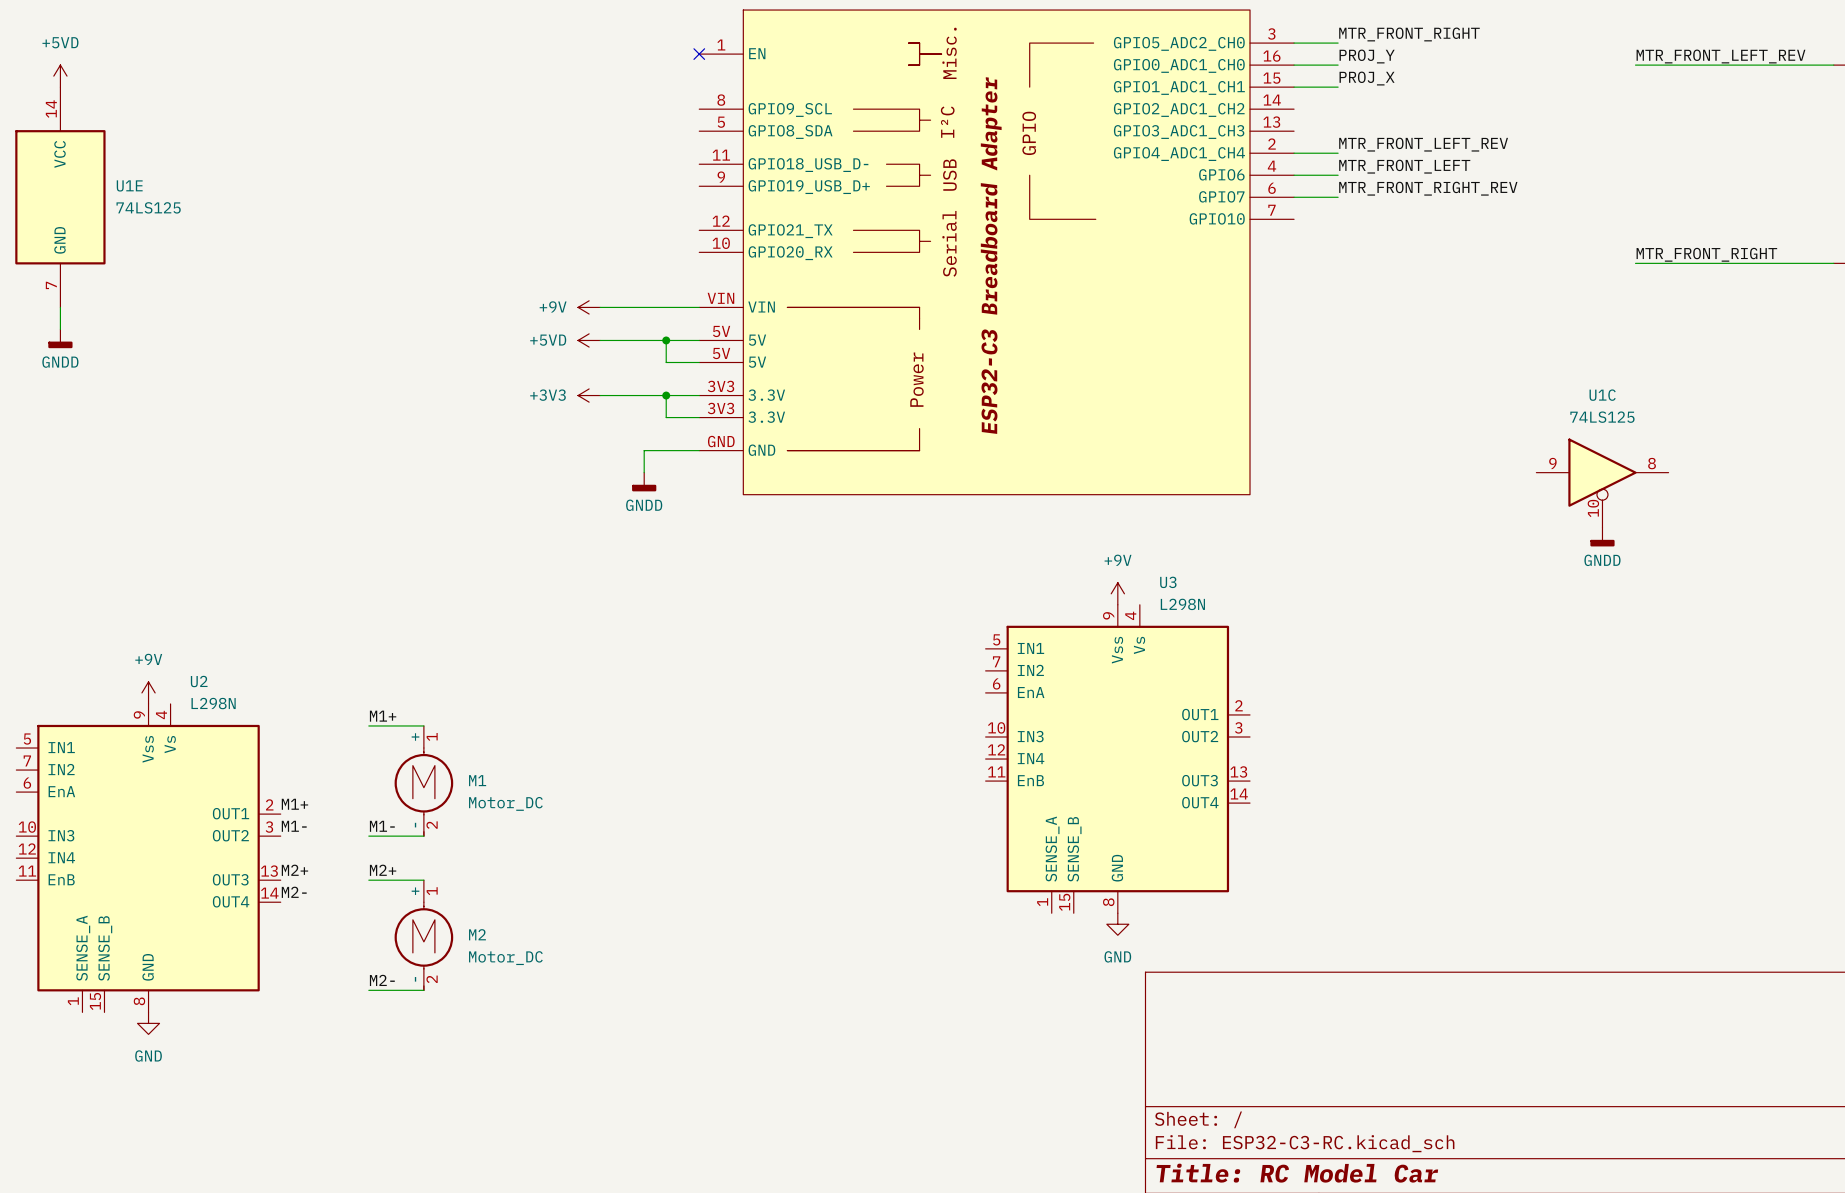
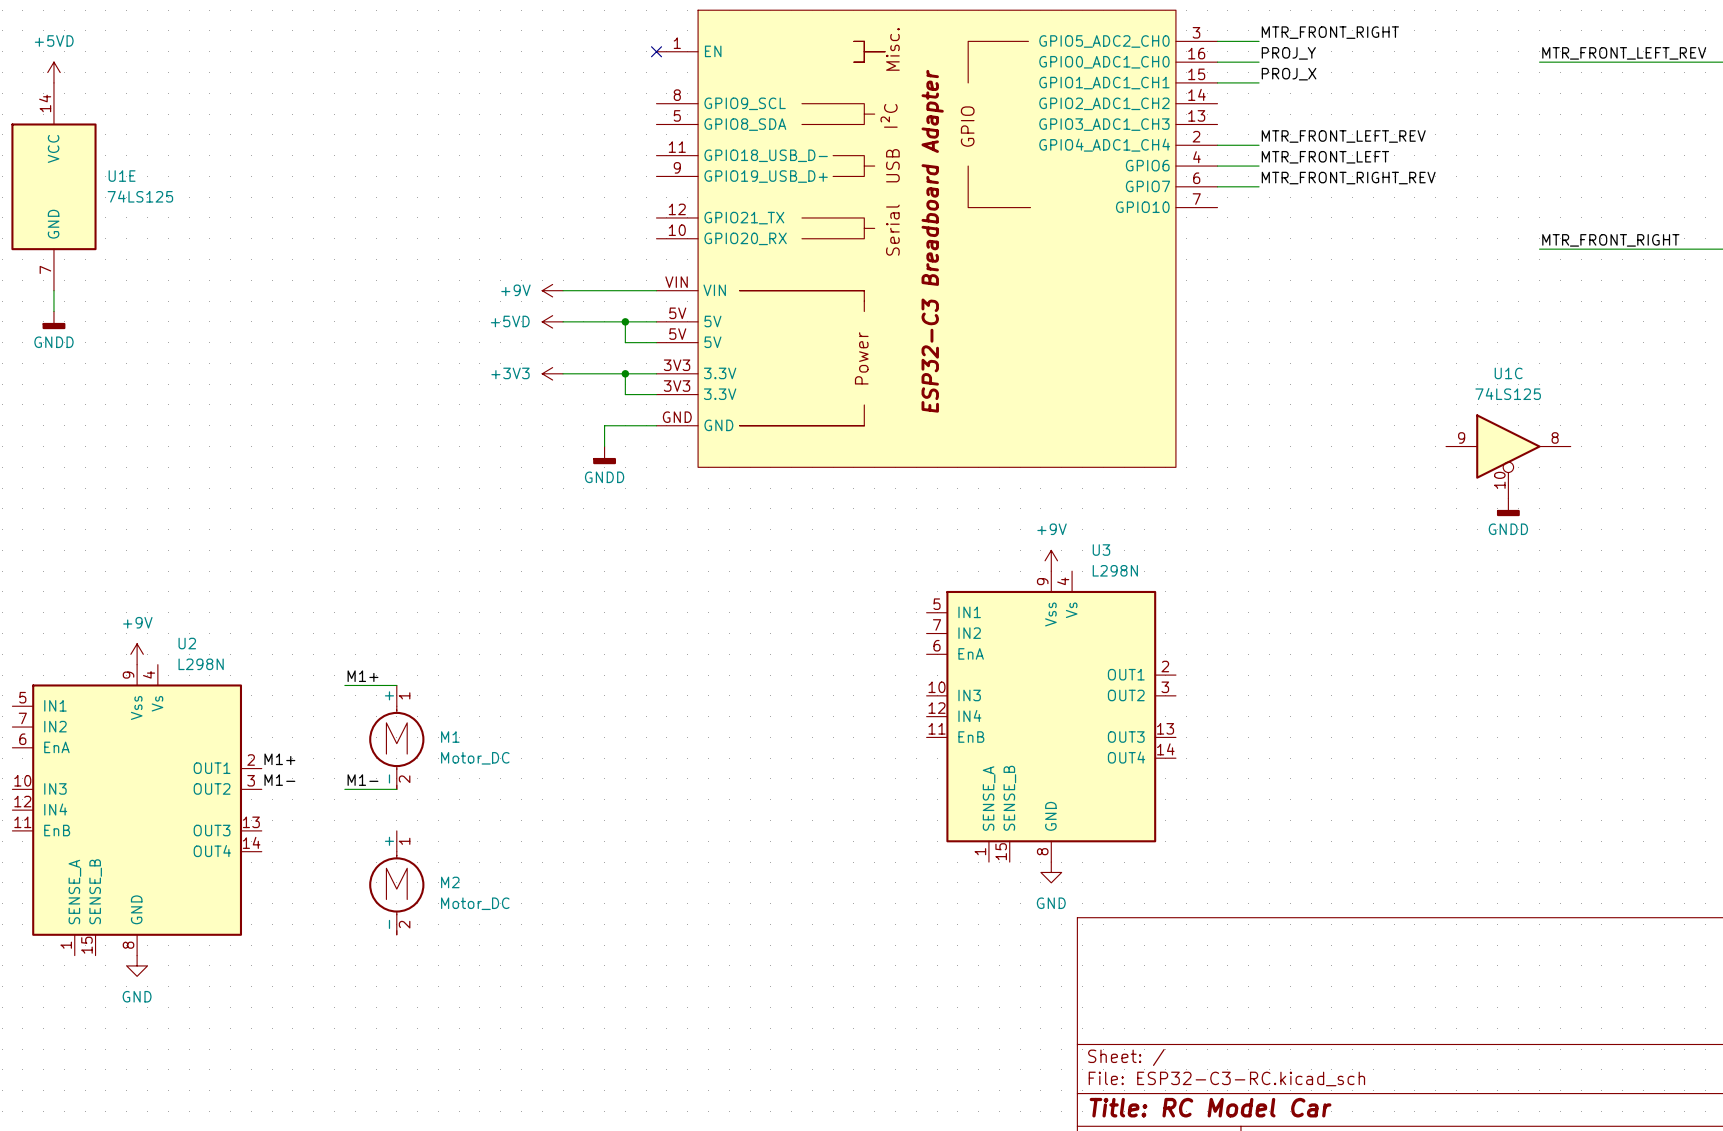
label: M2+ (294, 870) -> none
label: M2+ (383, 870) -> none
wire: (368, 880) (423, 880) -> none
label: M2- (294, 892) -> none
label: M2- (382, 980) -> none
wire: (368, 990) (423, 990) -> none

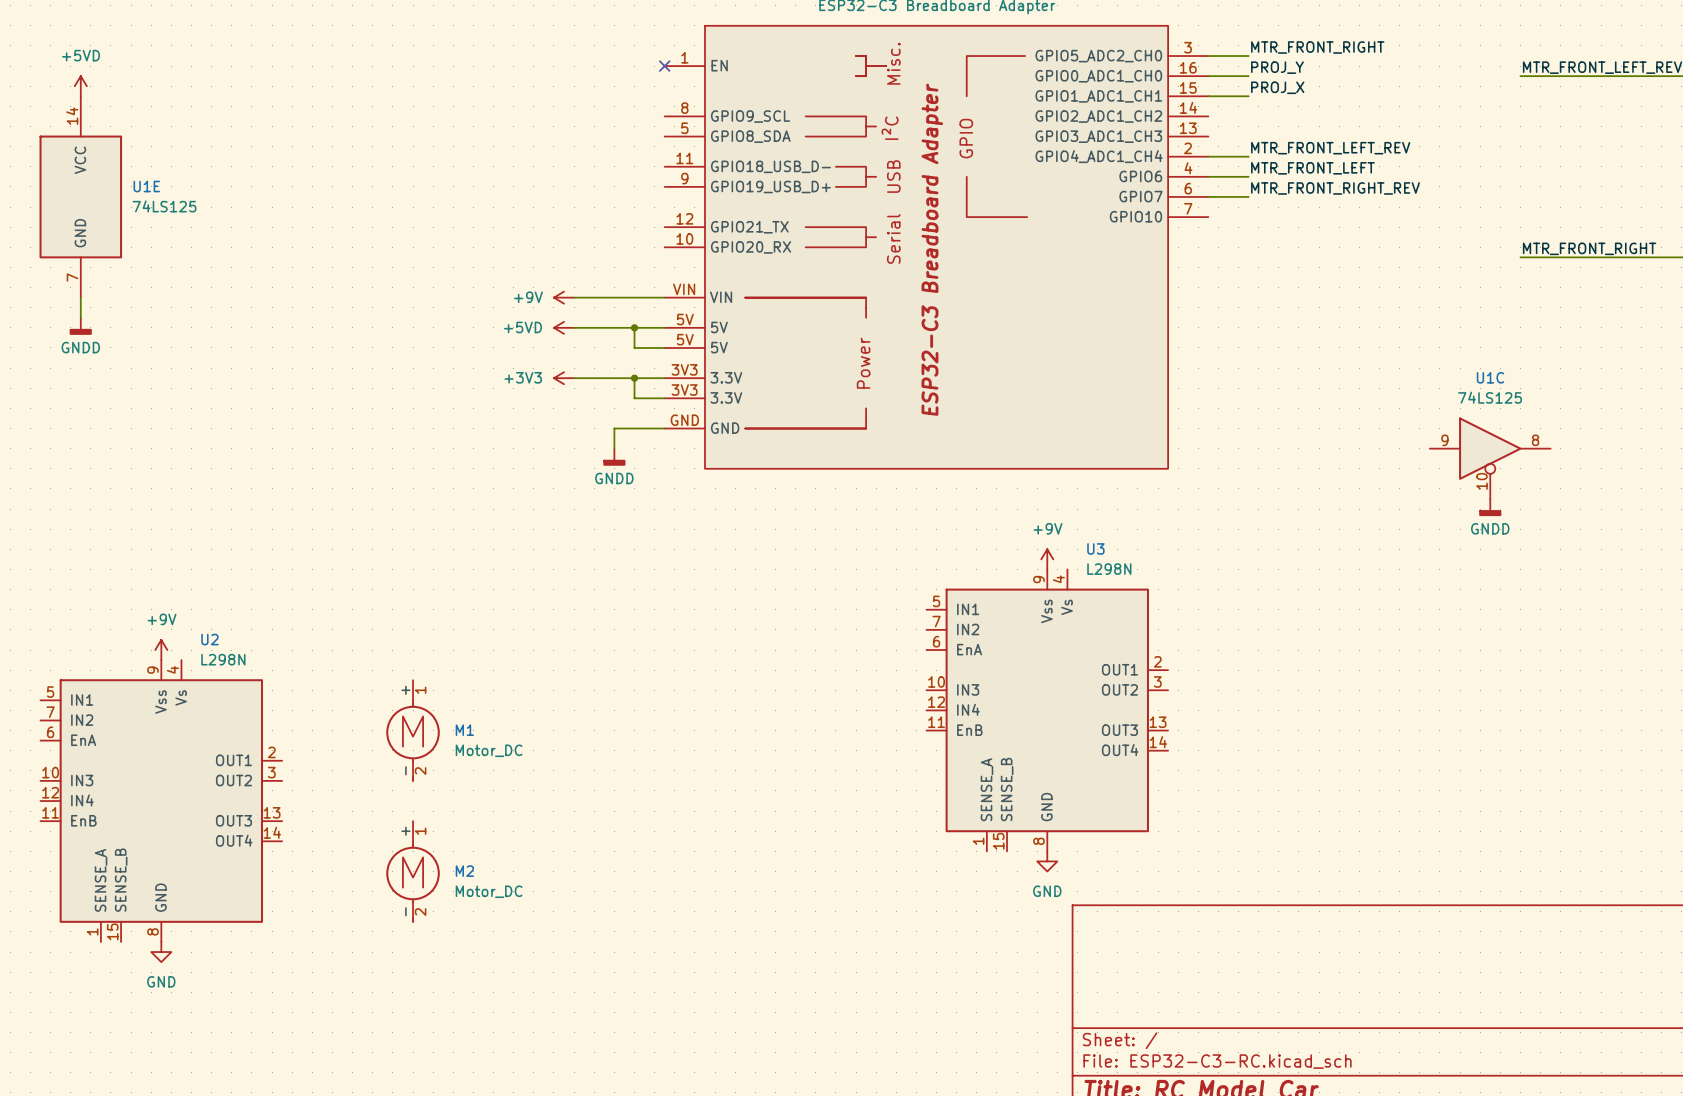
label: M1+ (362, 676) -> none
wire: (344, 685) (396, 685) -> none
label: M1+ (279, 759) -> none
label: M1- (279, 780) -> none
label: M1- (362, 780) -> none
wire: (344, 789) (396, 789) -> none

